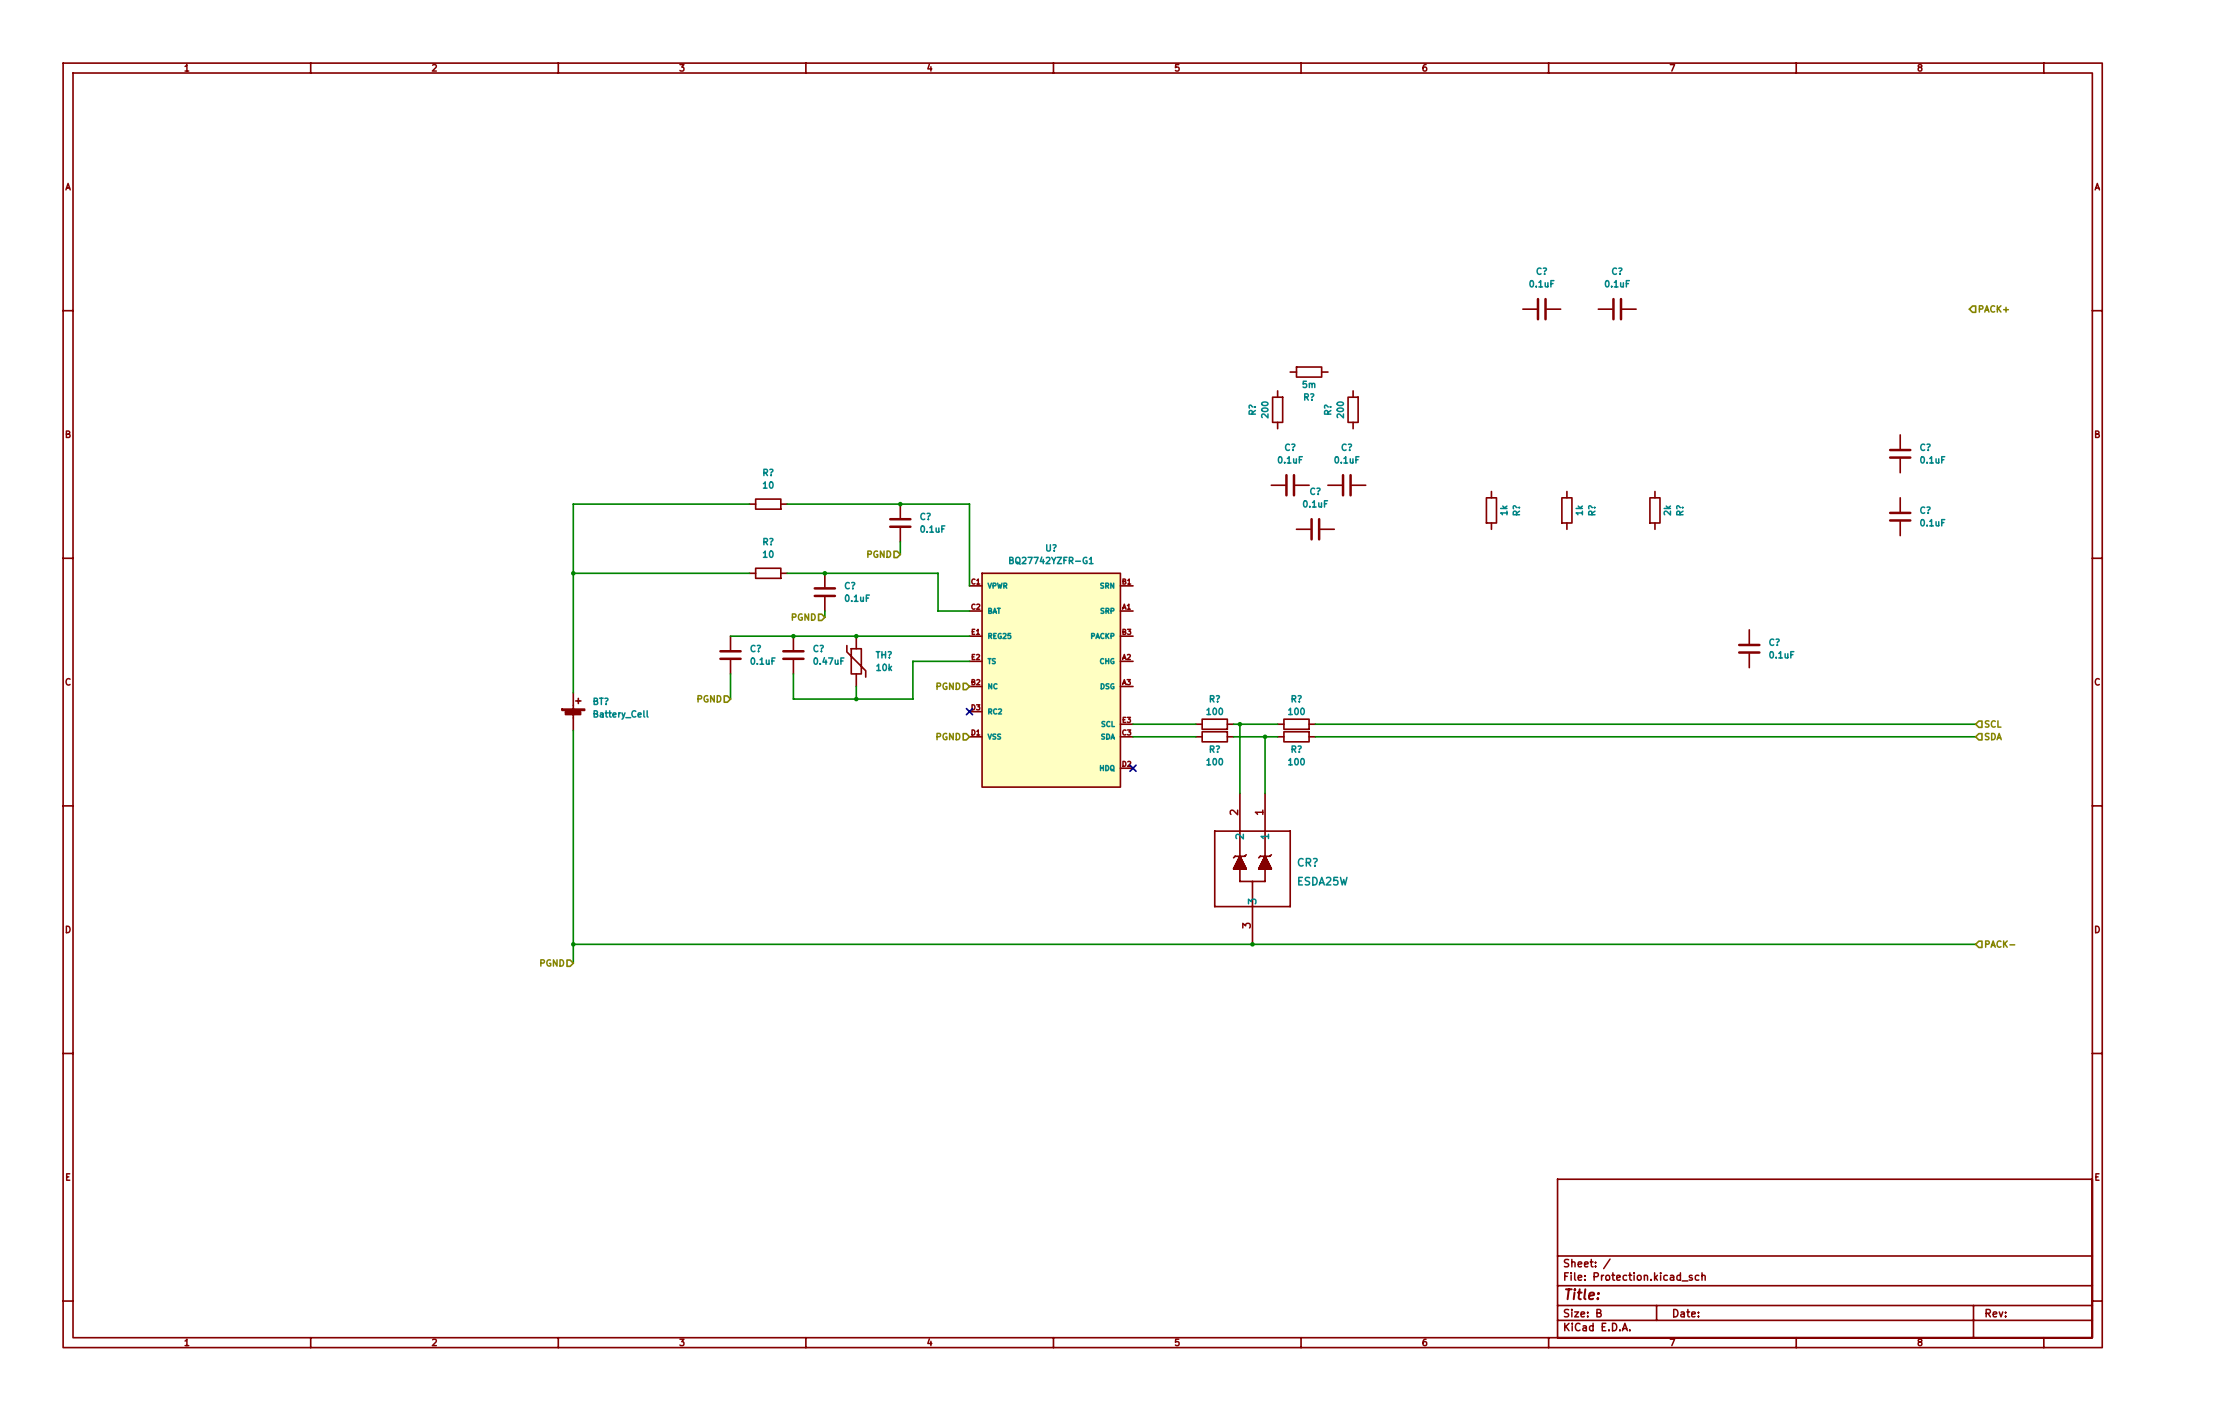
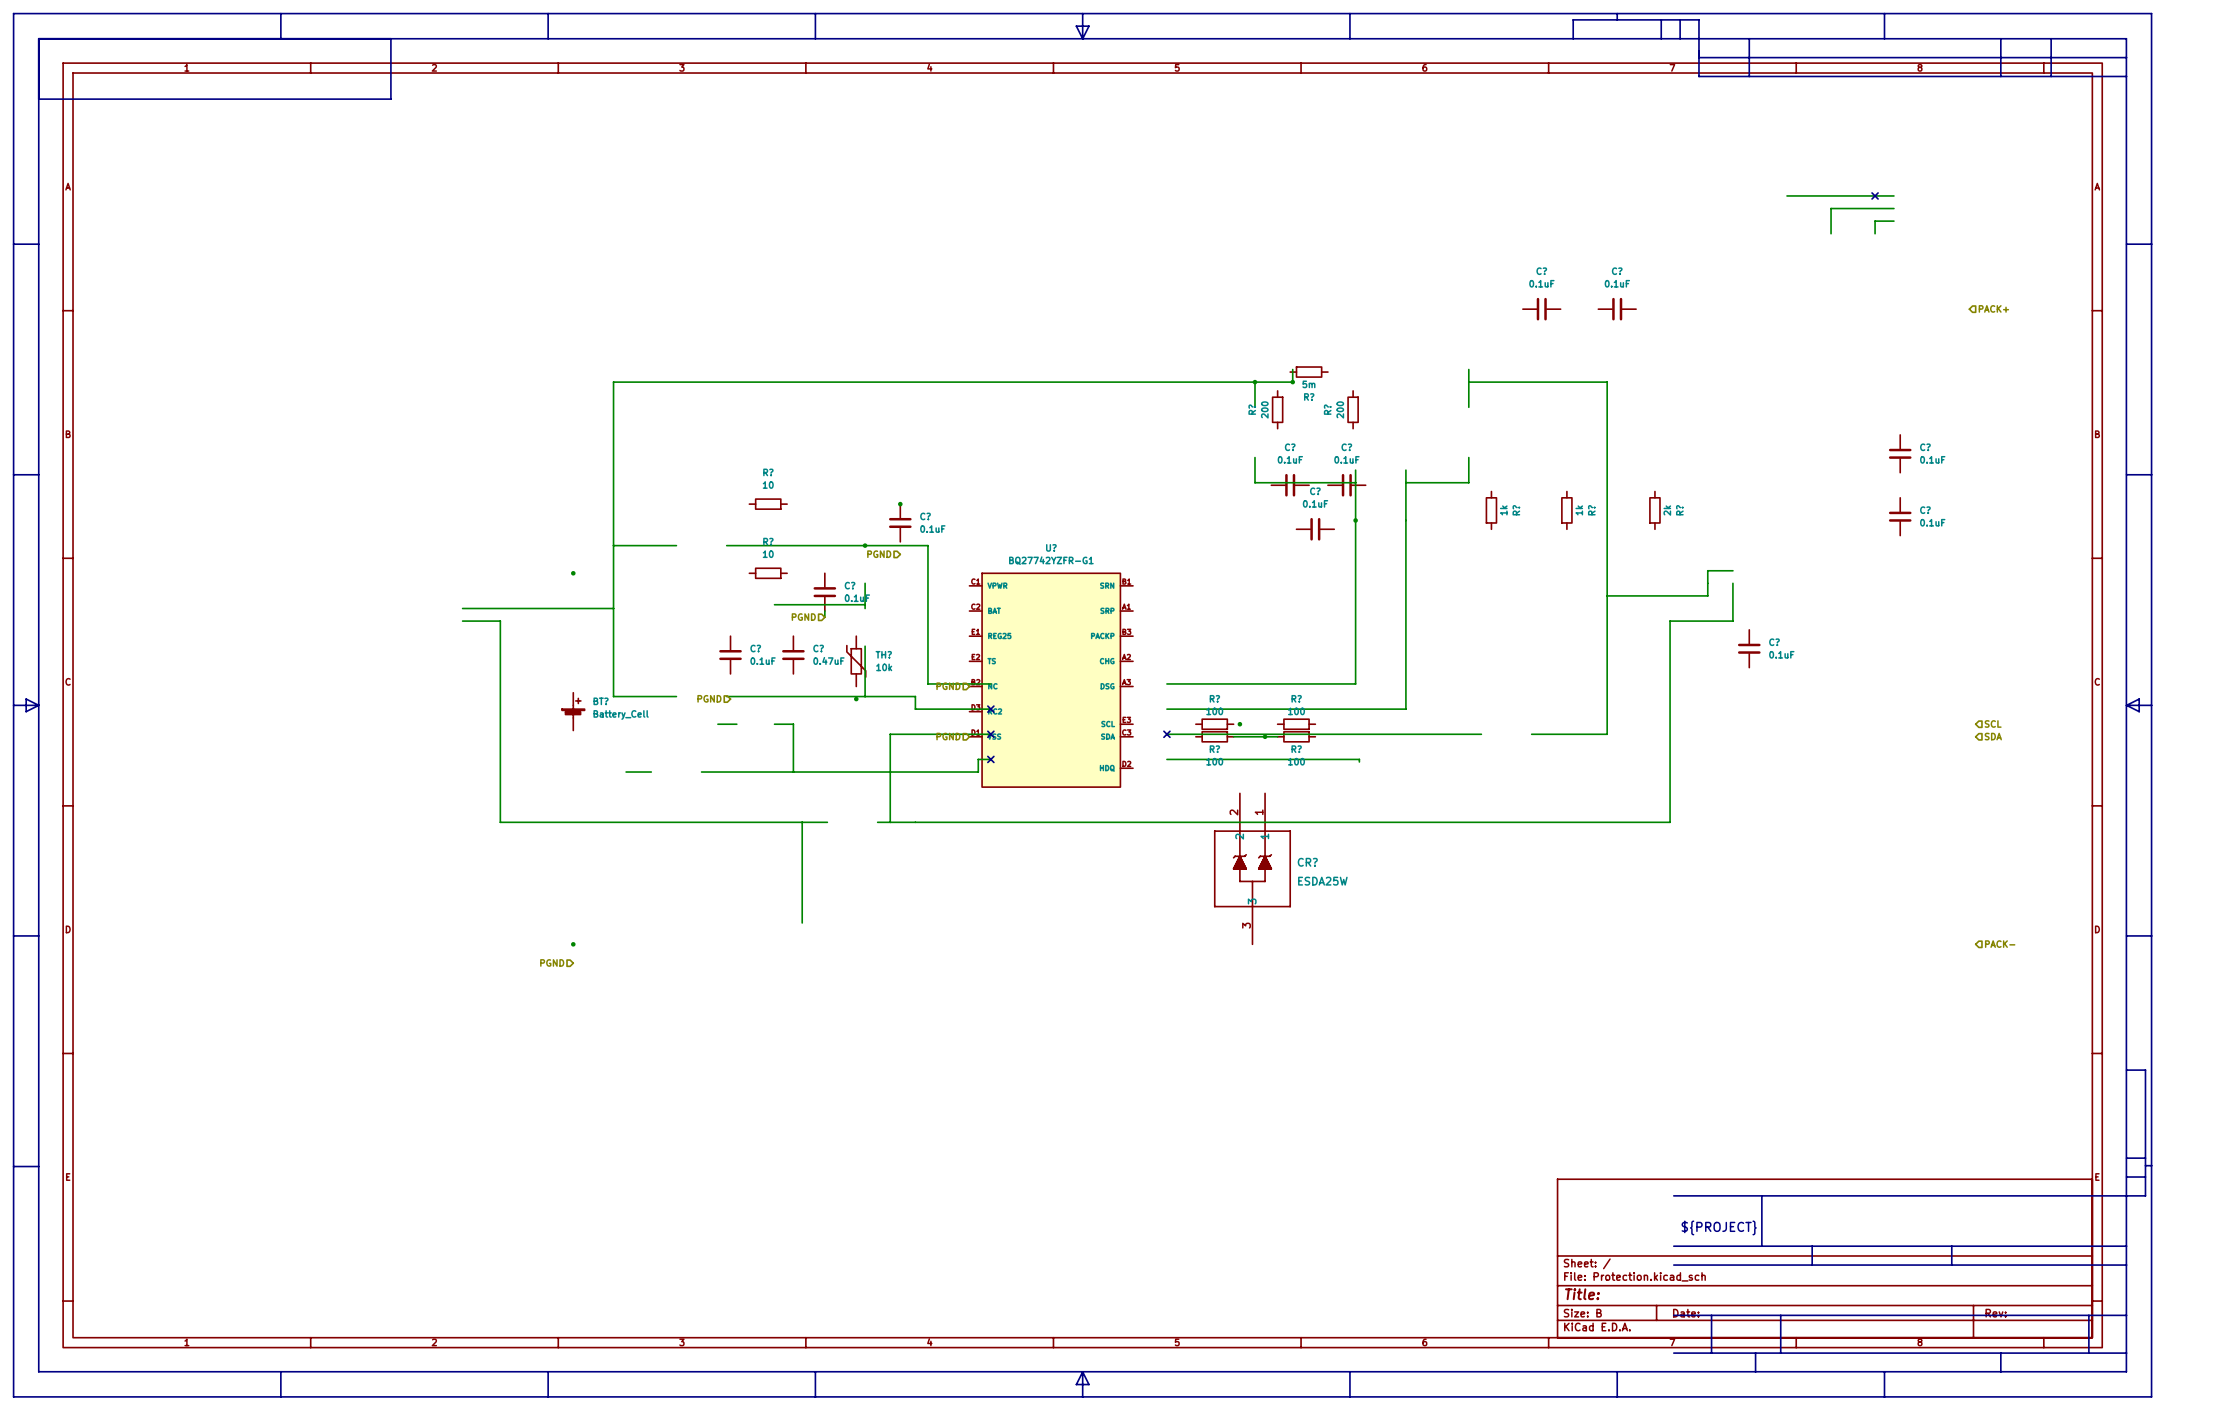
line: none -> (13, 13) (13, 1396) (2151, 1396) (2151, 13) (13, 13)
line: none -> (280, 13) (280, 38)
line: none -> (548, 13) (548, 38)
line: none -> (815, 13) (815, 38)
line: none -> (1082, 13) (1082, 38)
line: none -> (1349, 13) (1349, 38)
line: none -> (1617, 13) (1617, 19)
line: none -> (1884, 13) (1884, 38)
line: none -> (1661, 19) (1661, 38)
line: none -> (1680, 19) (1680, 38)
line: none -> (38, 38) (38, 1371) (2126, 1371) (2126, 38) (38, 38)
line: none -> (390, 38) (390, 99) (38, 99)
line: none -> (1082, 38) (1076, 26) (1088, 26) (1082, 38)
line: none -> (1573, 38) (1573, 19) (1698, 19) (1698, 76) (2126, 76)
line: none -> (1749, 38) (1749, 76)
line: none -> (2000, 38) (2000, 76)
line: none -> (2051, 38) (2051, 76)
line: none -> (1698, 57) (2126, 57)
wire: none -> (1787, 195) (1893, 195)
no-connect mark: none -> (1875, 195)
wire: none -> (1893, 208) (1831, 208) (1831, 233)
wire: none -> (1893, 221) (1875, 221) (1875, 233)
line: none -> (13, 244) (38, 244)
line: none -> (2126, 244) (2151, 244)
wire: none -> (1292, 369) (1292, 382) (613, 382) (613, 696) (676, 696)
wire: none -> (1468, 369) (1468, 407)
wire: none -> (1254, 382) (1254, 407)
junction: none -> (1254, 382)
junction: none -> (1292, 382)
wire: none -> (1468, 382) (1607, 382) (1607, 734) (1531, 734)
wire: none -> (1254, 457) (1254, 482) (1355, 482)
wire: none -> (1468, 457) (1468, 482) (1405, 482)
wire: none -> (1355, 470) (1355, 683) (1166, 683)
wire: none -> (1405, 470) (1405, 709) (1166, 709)
line: none -> (13, 474) (38, 474)
line: none -> (2126, 474) (2151, 474)
wire: (749, 504) (573, 504) (573, 692) -> none
wire: (787, 504) (969, 504) (969, 585) -> none
junction: none -> (1355, 520)
wire: (900, 541) (900, 554) -> none
wire: none -> (613, 545) (676, 545)
wire: none -> (726, 545) (927, 545) (927, 683) (990, 683)
junction: none -> (865, 545)
wire: none -> (1732, 570) (1707, 570) (1707, 595) (1607, 595)
wire: (573, 573) (749, 573) -> none
wire: (787, 573) (938, 573) (938, 611) (969, 611) -> none
junction: (824, 573) -> none
wire: none -> (865, 583) (865, 608)
wire: none -> (1732, 583) (1732, 621) (1670, 621) (1670, 822) (877, 822)
wire: none -> (774, 604) (865, 604)
wire: none -> (462, 608) (613, 608)
wire: none -> (462, 621) (500, 621) (500, 822) (827, 822)
wire: (730, 636) (969, 636) -> none
junction: (793, 636) -> none
junction: (856, 636) -> none
wire: none -> (865, 646) (865, 696)
wire: (969, 661) (912, 661) (912, 699) (793, 699) (793, 673) -> none
wire: (730, 673) (730, 699) -> none
wire: (856, 686) (856, 699) -> none
wire: none -> (726, 696) (915, 696) (915, 709) (990, 709)
line: none -> (13, 705) (38, 705)
line: none -> (38, 705) (26, 711) (26, 699) (38, 705)
line: none -> (2126, 705) (2139, 711) (2139, 699) (2126, 705)
line: none -> (2126, 705) (2151, 705)
no-connect mark: none -> (990, 709)
no-connect mark: (969, 711) -> none
wire: none -> (717, 724) (736, 724)
wire: none -> (774, 724) (793, 724) (793, 772)
wire: (1132, 724) (1195, 724) -> none
wire: (1233, 724) (1277, 724) -> none
wire: (1239, 724) (1239, 793) -> none
wire: (1315, 724) (1975, 724) -> none
wire: (573, 730) (573, 963) -> none
wire: none -> (990, 734) (890, 734) (890, 822)
no-connect mark: none -> (990, 734)
wire: none -> (1166, 734) (1481, 734)
no-connect mark: none -> (1166, 734)
wire: (1132, 736) (1195, 736) -> none
wire: (1265, 736) (1265, 793) -> none
wire: (1315, 736) (1975, 736) -> none
wire: none -> (990, 759) (978, 759) (978, 772) (701, 772)
no-connect mark: none -> (990, 759)
wire: none -> (1166, 759) (1359, 759) (1359, 761)
no-connect mark: (1132, 768) -> none
wire: none -> (626, 772) (651, 772)
wire: none -> (802, 822) (802, 922)
line: none -> (13, 935) (38, 935)
line: none -> (2126, 935) (2151, 935)
wire: (573, 944) (1975, 944) -> none
junction: (1252, 944) -> none
line: none -> (2126, 1070) (2145, 1070) (2145, 1195) (1673, 1195)
line: none -> (2126, 1158) (2145, 1158)
line: none -> (2145, 1165) (2151, 1165)
line: none -> (13, 1166) (38, 1166)
line: none -> (2126, 1177) (2145, 1177)
line: none -> (1761, 1195) (1761, 1246)
text: none -> ${PROJECT} (1719, 1227)
line: none -> (1673, 1246) (2126, 1246)
line: none -> (1812, 1246) (1812, 1265)
line: none -> (1951, 1246) (1951, 1265)
line: none -> (1673, 1265) (2126, 1265)
line: none -> (1673, 1315) (2126, 1315)
line: none -> (1711, 1315) (1711, 1353)
line: none -> (1780, 1315) (1780, 1353)
line: none -> (2088, 1315) (2088, 1353)
line: none -> (1673, 1353) (2126, 1353)
line: none -> (1755, 1353) (1755, 1371)
line: none -> (2000, 1353) (2000, 1371)
line: none -> (280, 1371) (280, 1397)
line: none -> (548, 1371) (548, 1397)
line: none -> (815, 1371) (815, 1397)
line: none -> (1082, 1371) (1088, 1384) (1076, 1384) (1082, 1371)
line: none -> (1082, 1371) (1082, 1397)
line: none -> (1349, 1371) (1349, 1397)
line: none -> (1617, 1371) (1617, 1397)
line: none -> (1884, 1371) (1884, 1397)

